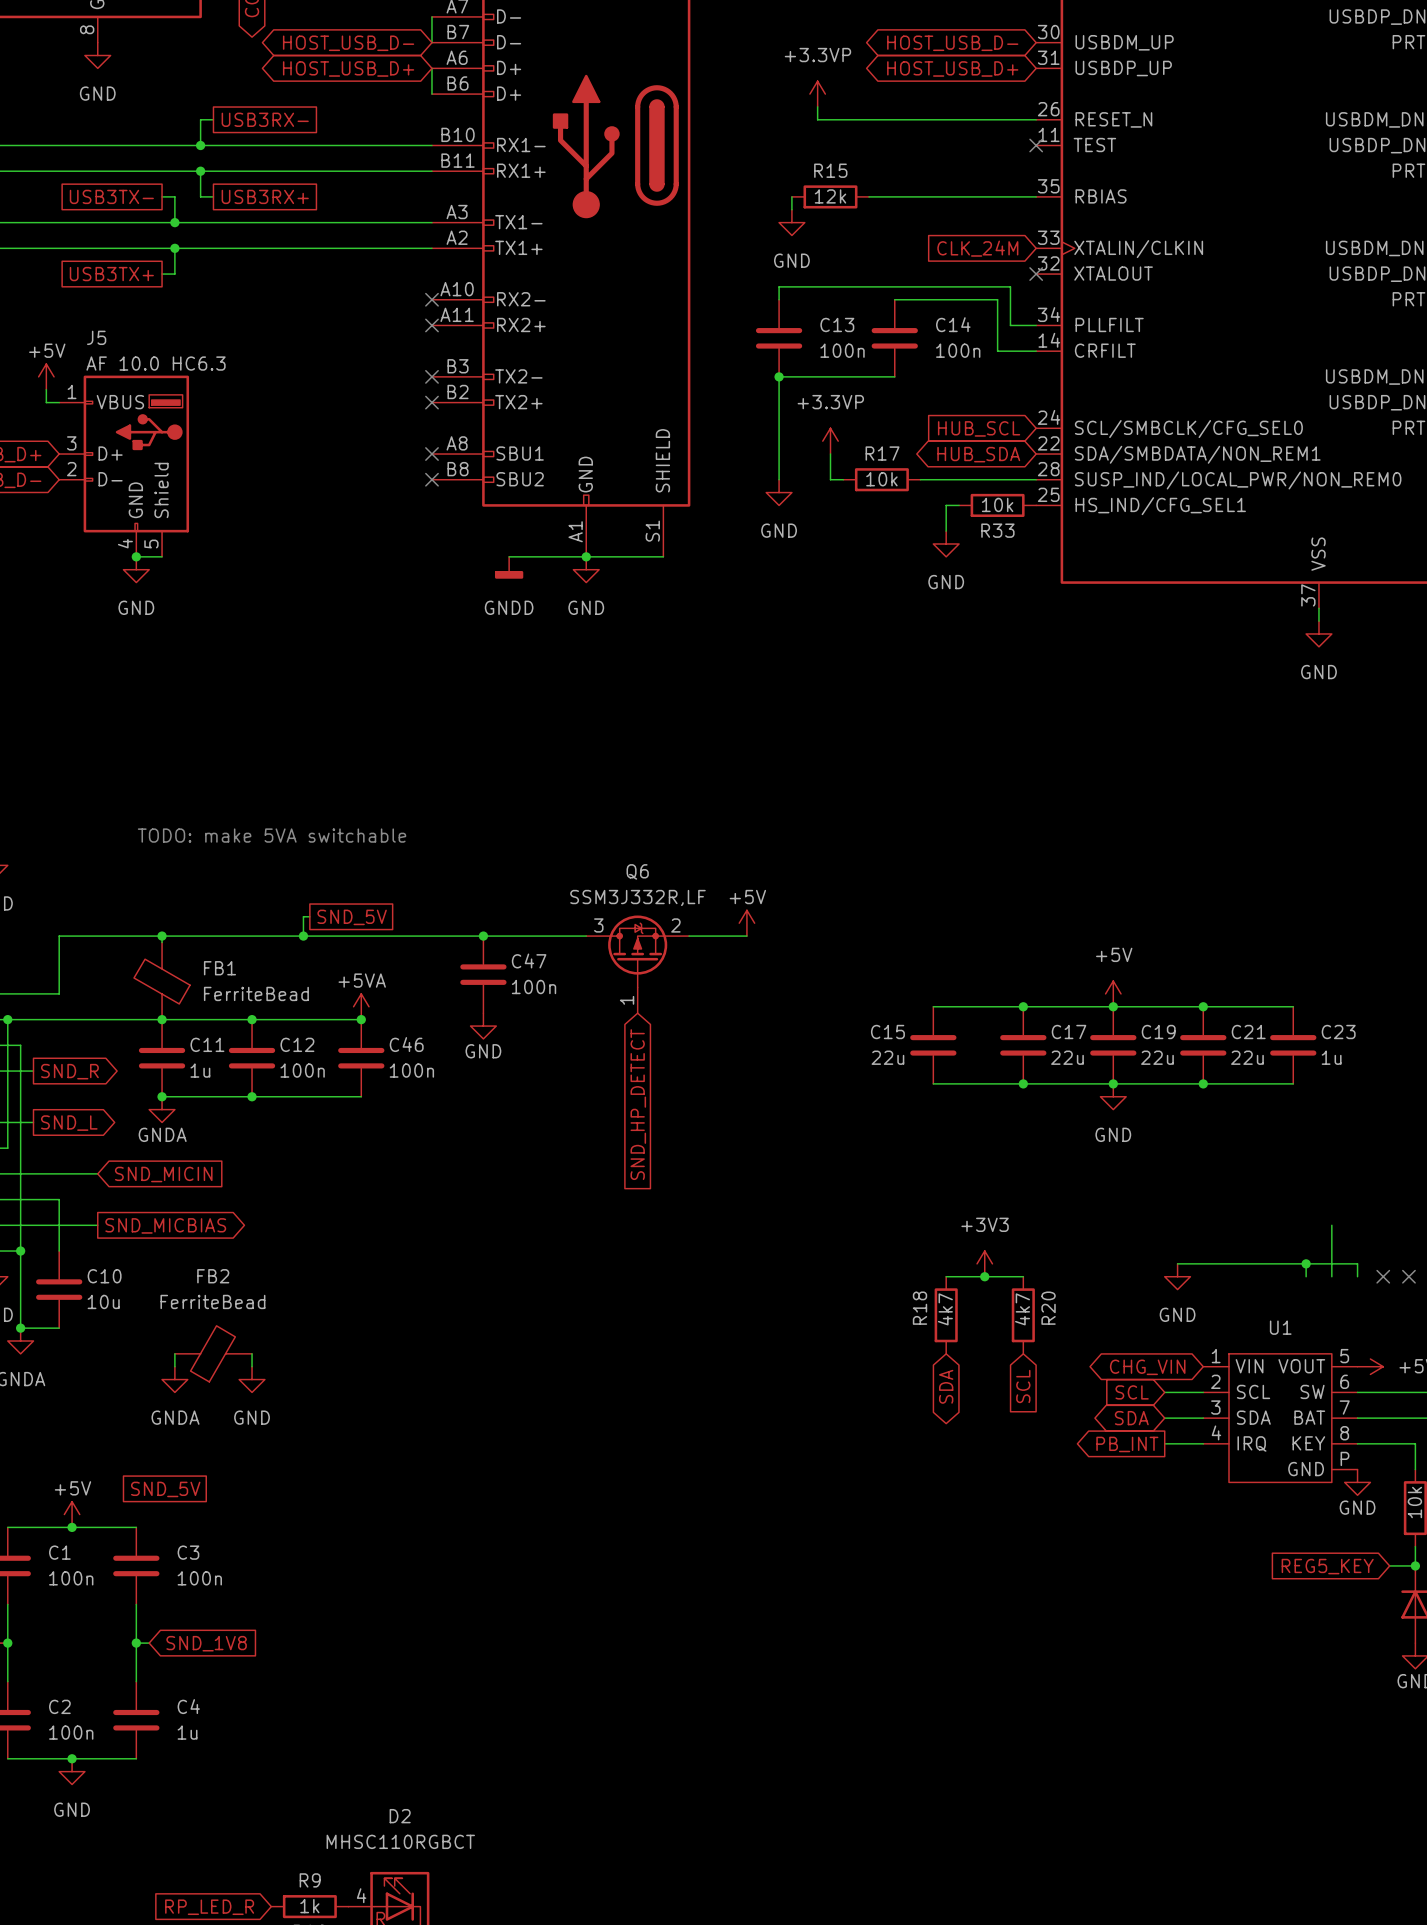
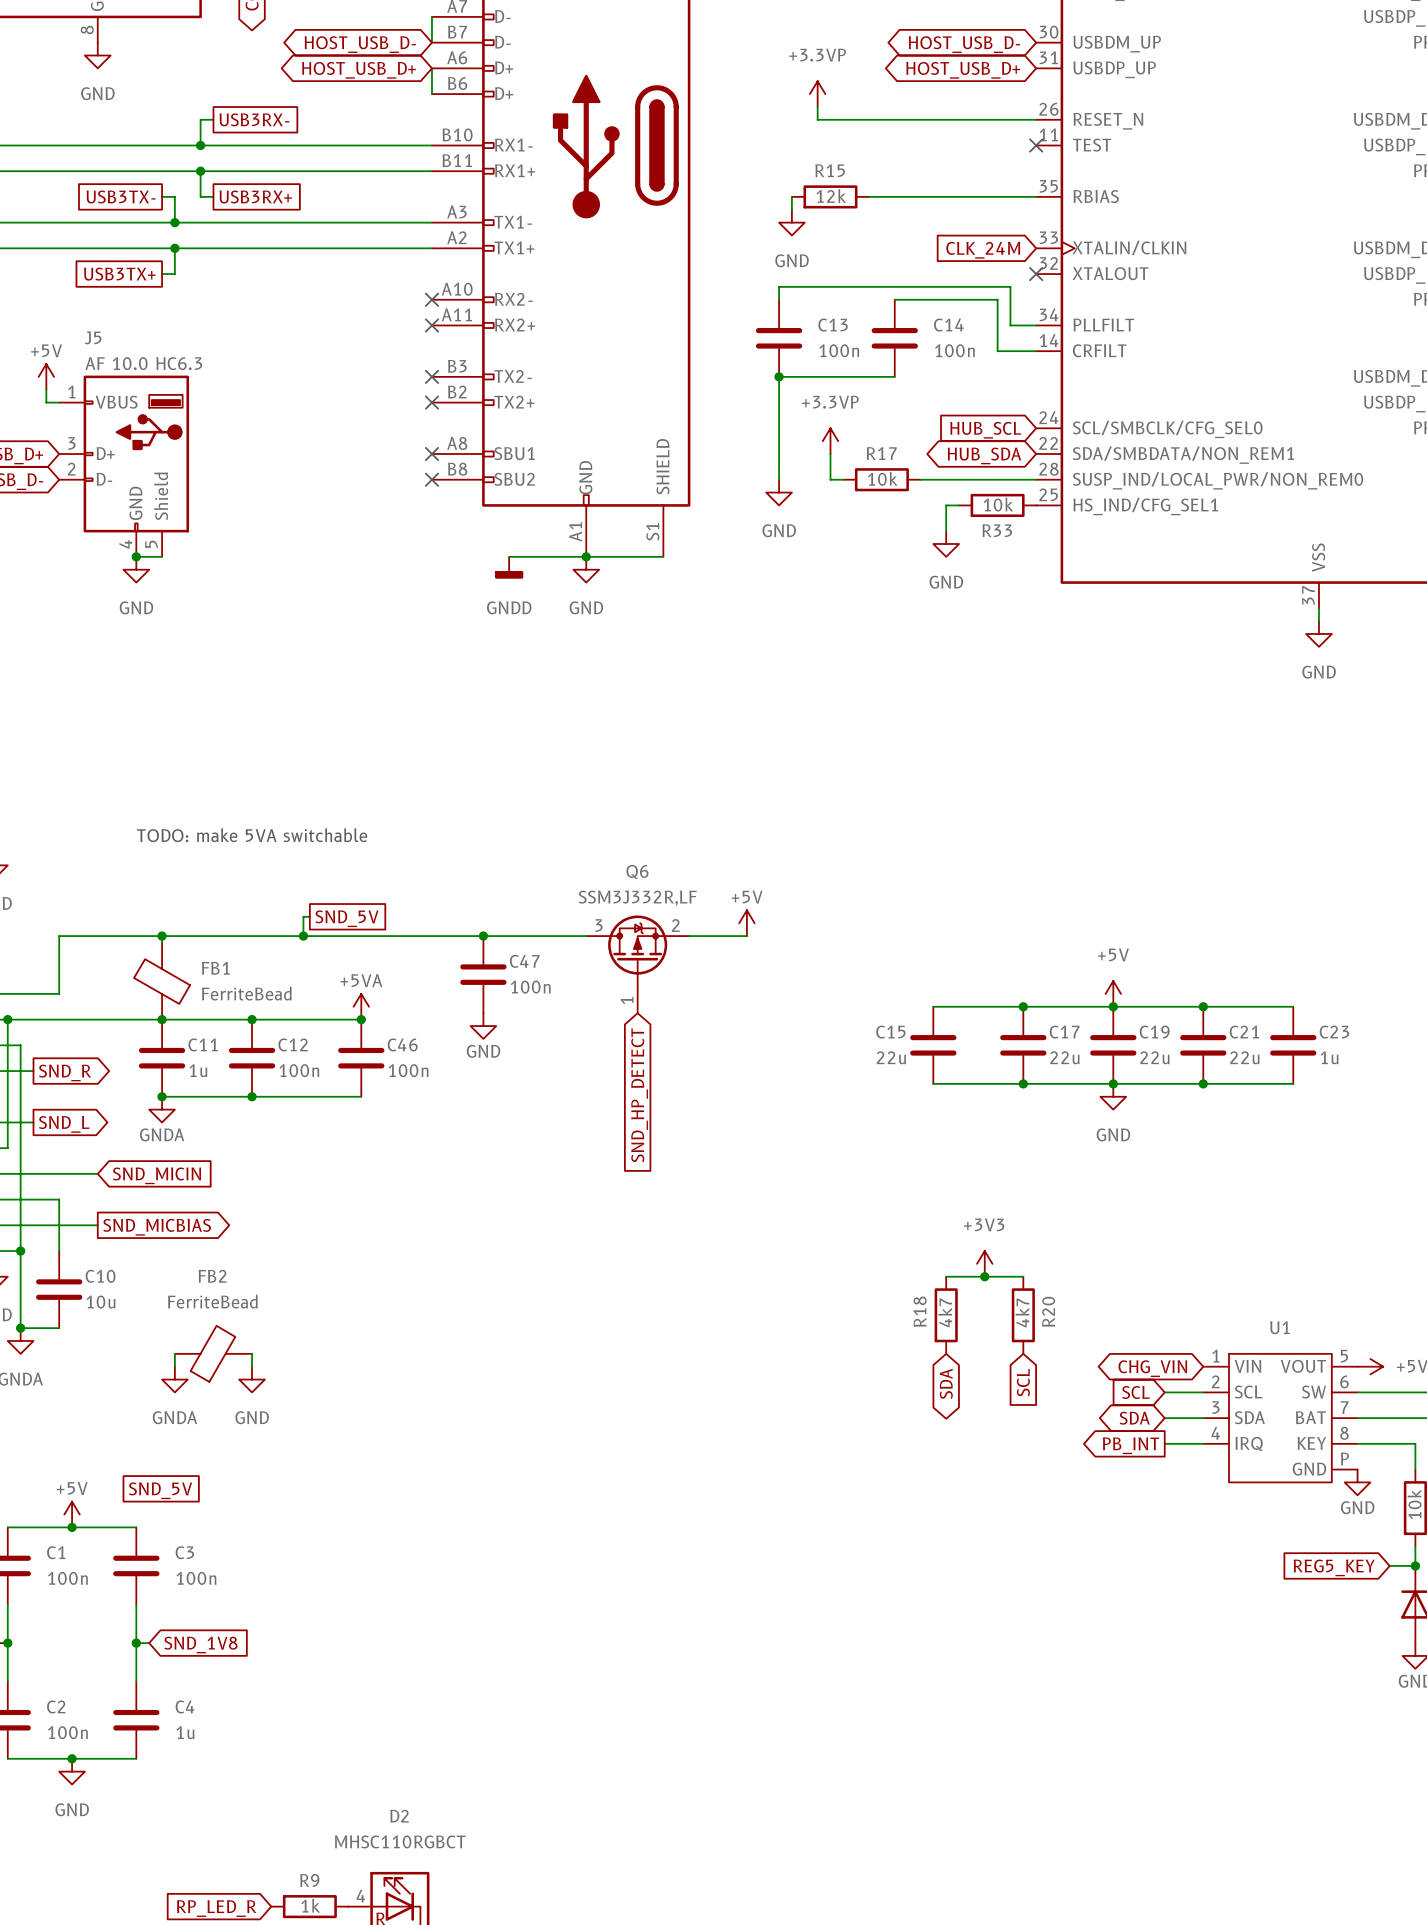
wire: (1331, 1225) (1331, 1276) -> none
wire: (1177, 1263) (1357, 1263) (1357, 1276) -> none
wire: (1306, 1263) (1306, 1276) -> none
junction: (1306, 1263) -> none
power symbol: GND (1177, 1276) -> none
no-connect mark: (1383, 1276) -> none
no-connect mark: (1408, 1276) -> none

